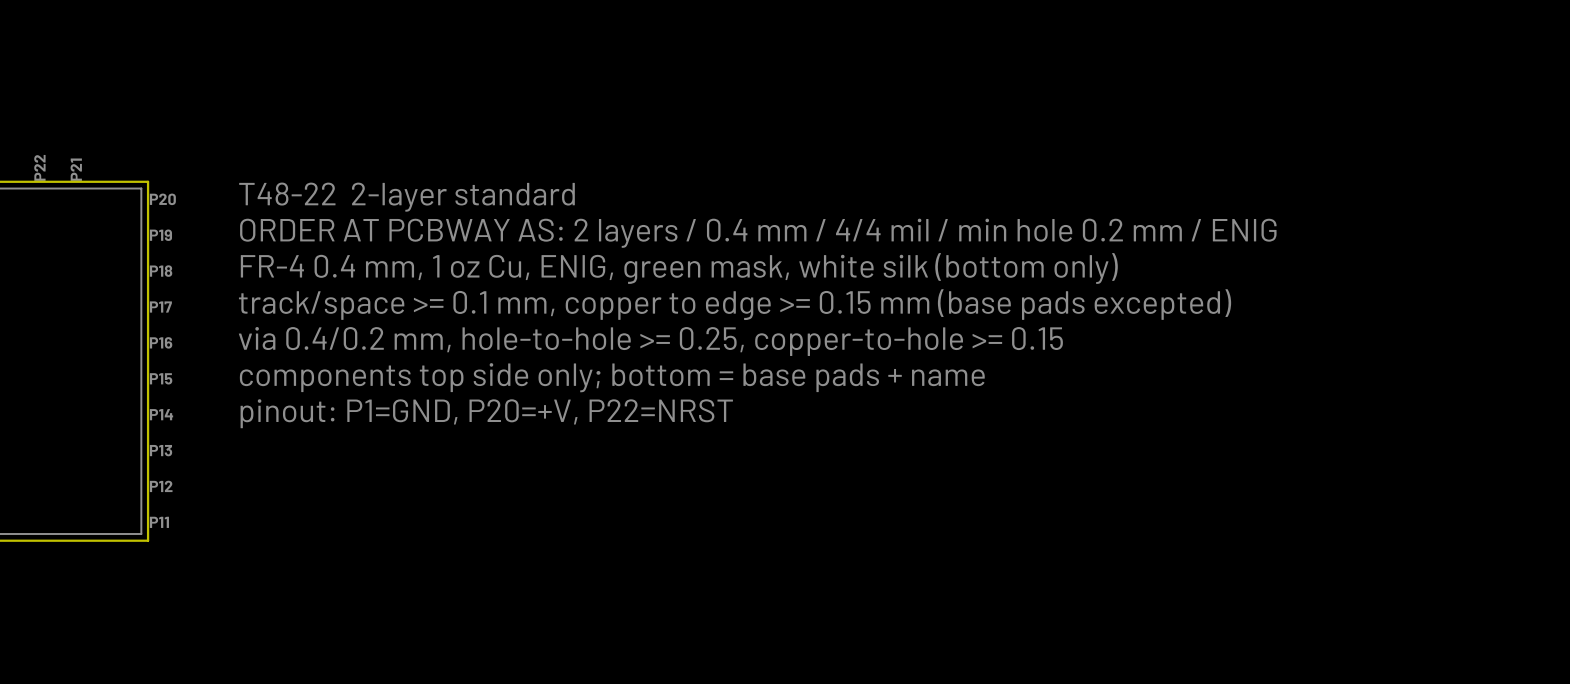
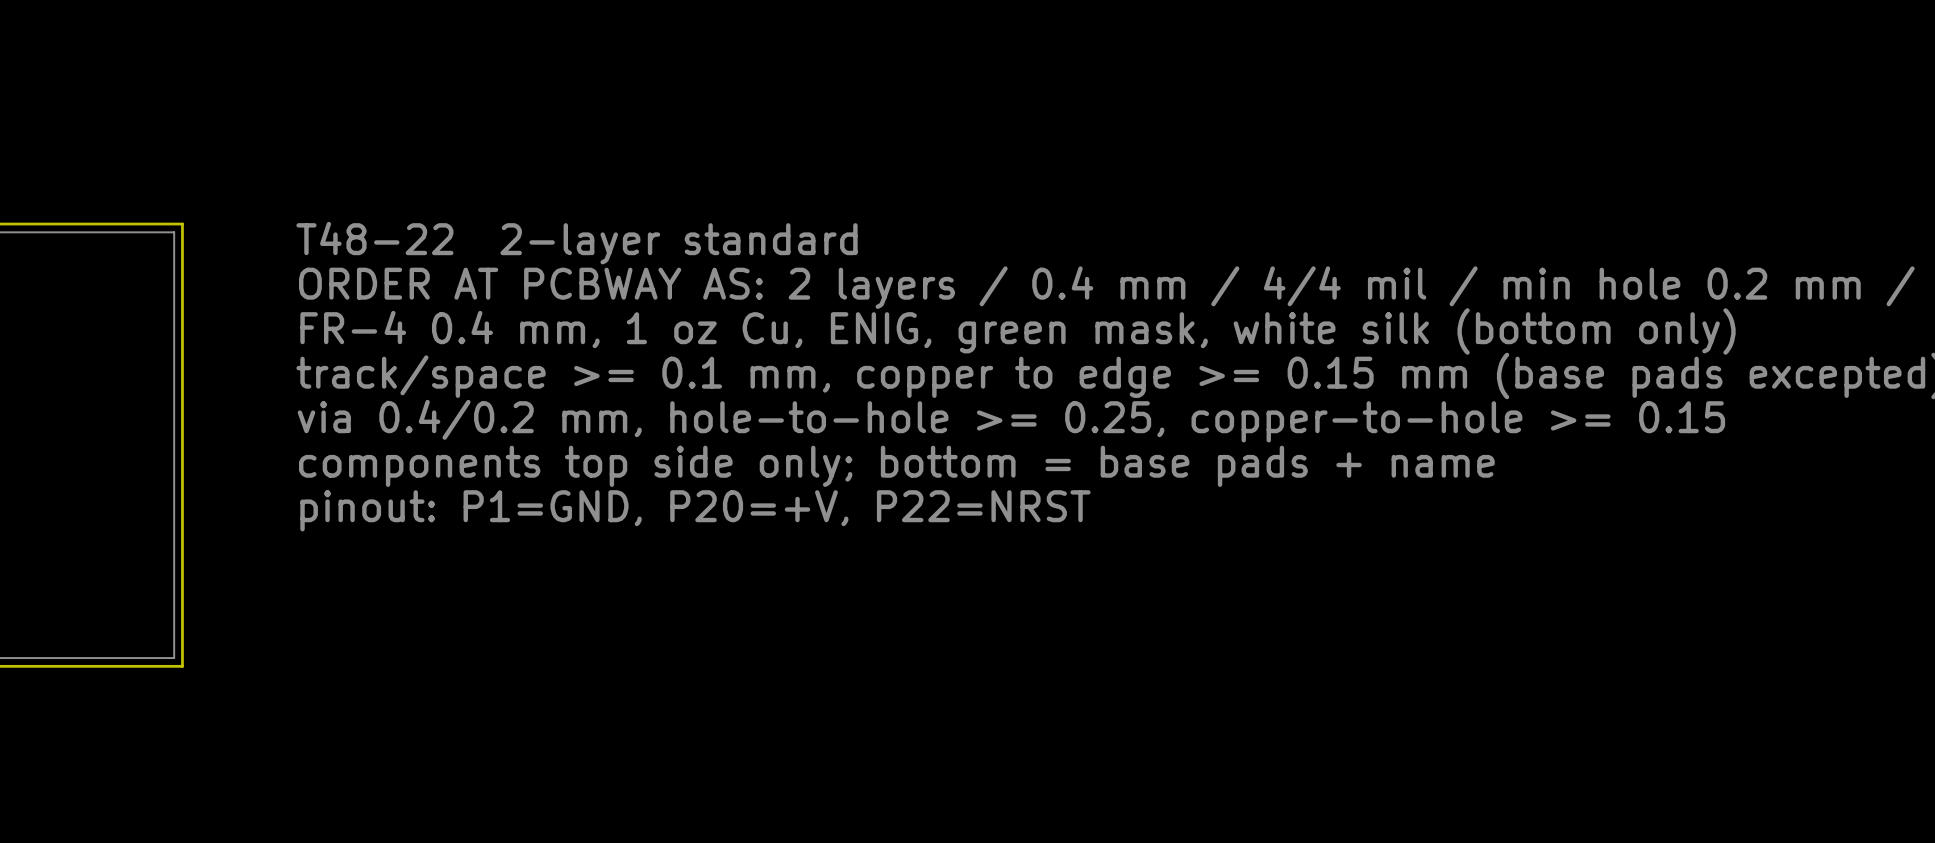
text: P22 (39, 167) -> none
text: P21 (76, 169) -> none
text: P20 (162, 199) -> none
text: P19 (160, 235) -> none
text: P18 (161, 271) -> none
text: P17 (160, 306) -> none
text: P16 (161, 342) -> none
text: P15 (161, 378) -> none
text: P14 (161, 414) -> none
text: P13 (161, 450) -> none
text: P12 (161, 486) -> none
text: P11 (159, 522) -> none

